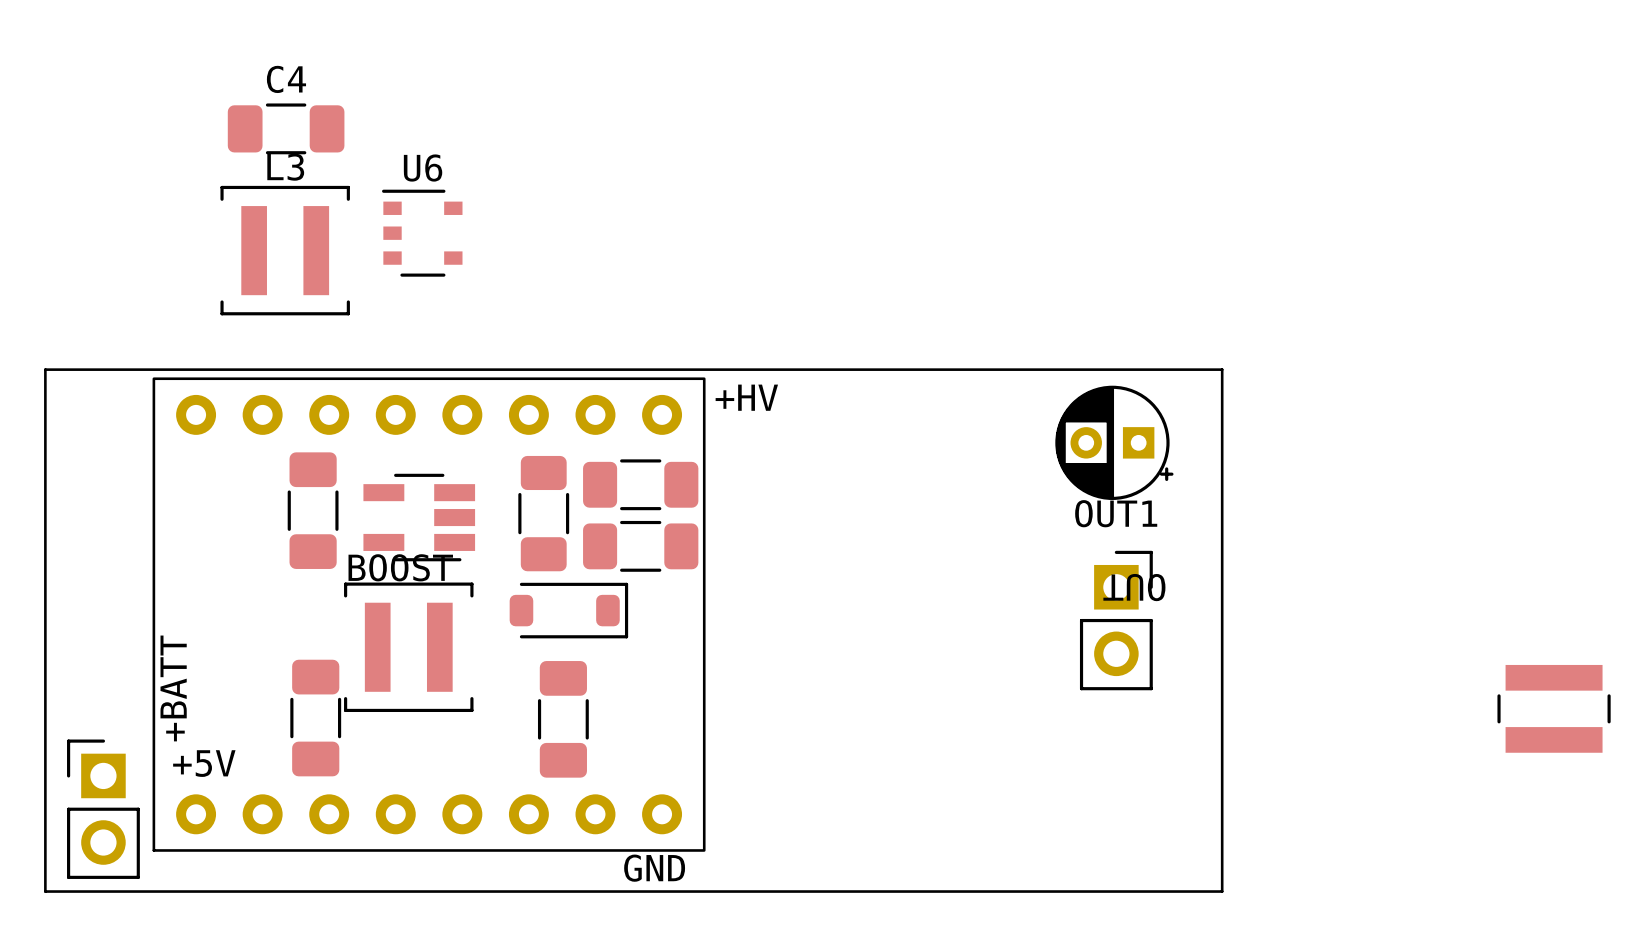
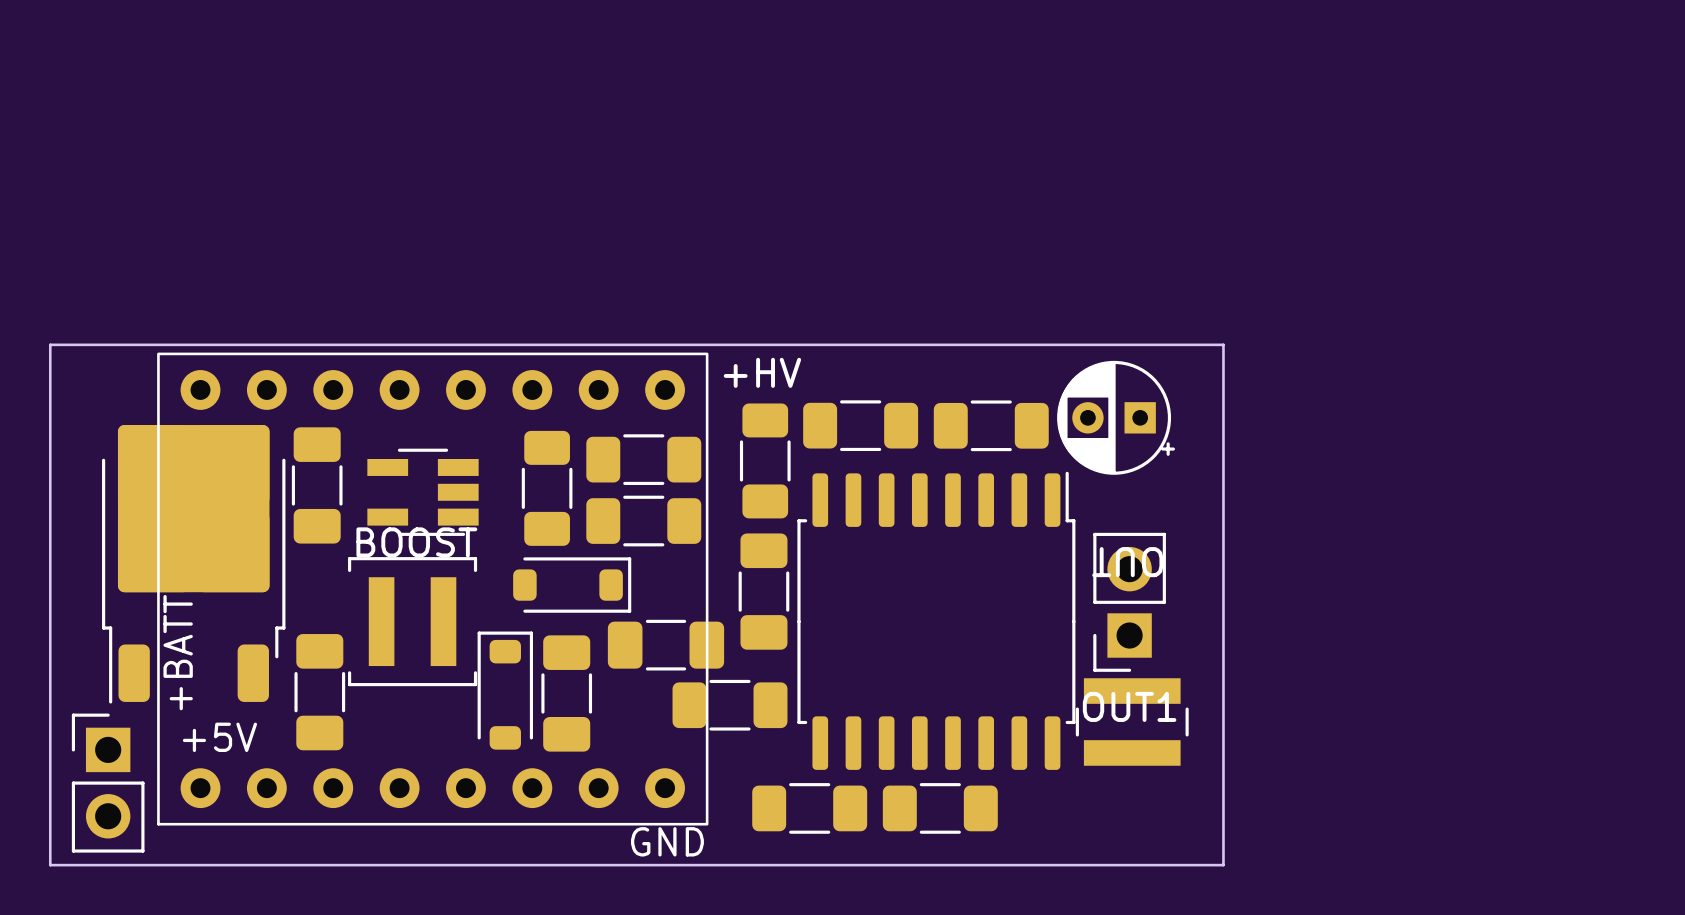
C4: (286, 128) -> none
U6: (422, 233) -> none
L3: (285, 250) -> none
part: none -> (860, 425)
part: none -> (991, 425)
part: none -> (765, 460)
part: none -> (193, 564)
part: none -> (763, 591)
OUT1 rotation: 0° (1116, 620) -> 180° (1129, 602)
part: none -> (936, 620)
part: none -> (665, 645)
part position: (1554, 708) -> (1132, 722)
part: none -> (505, 690)
part: none -> (730, 705)
part: none -> (809, 808)
part: none -> (940, 808)

